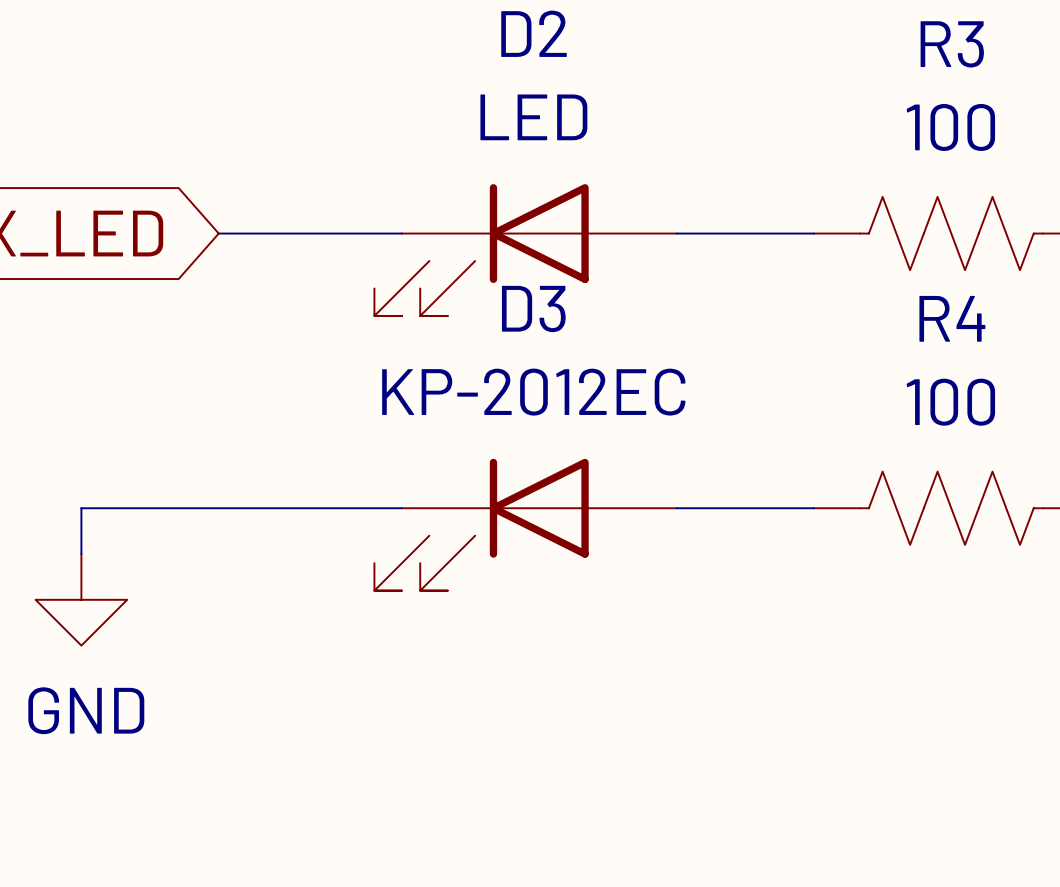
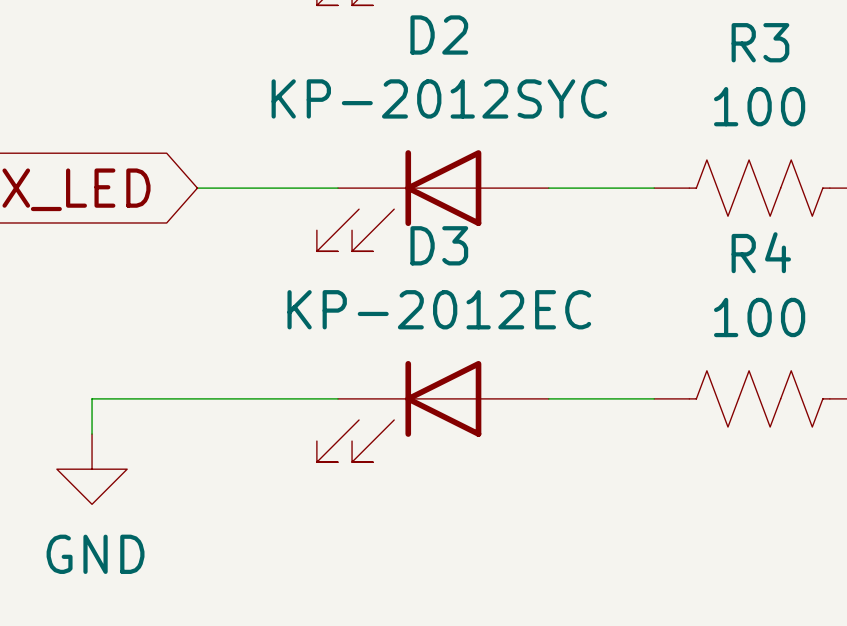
D2 value: LED (533, 117) -> KP-2012SYC (439, 98)

